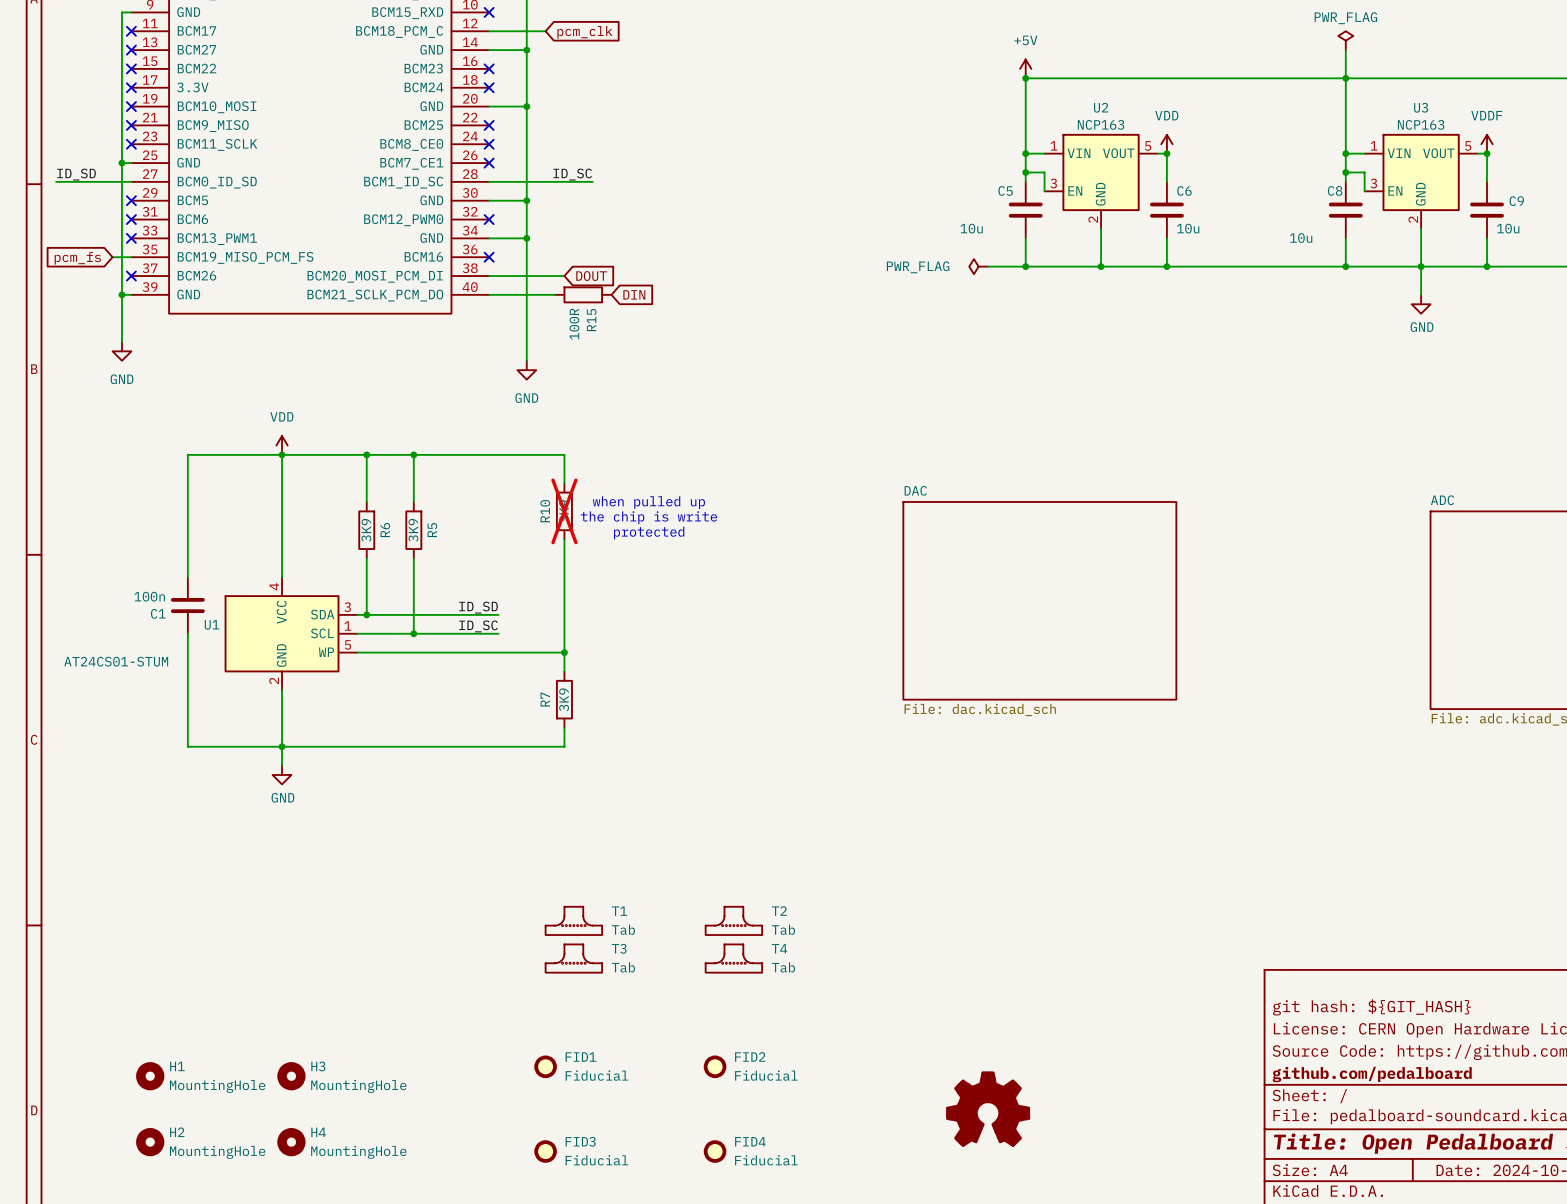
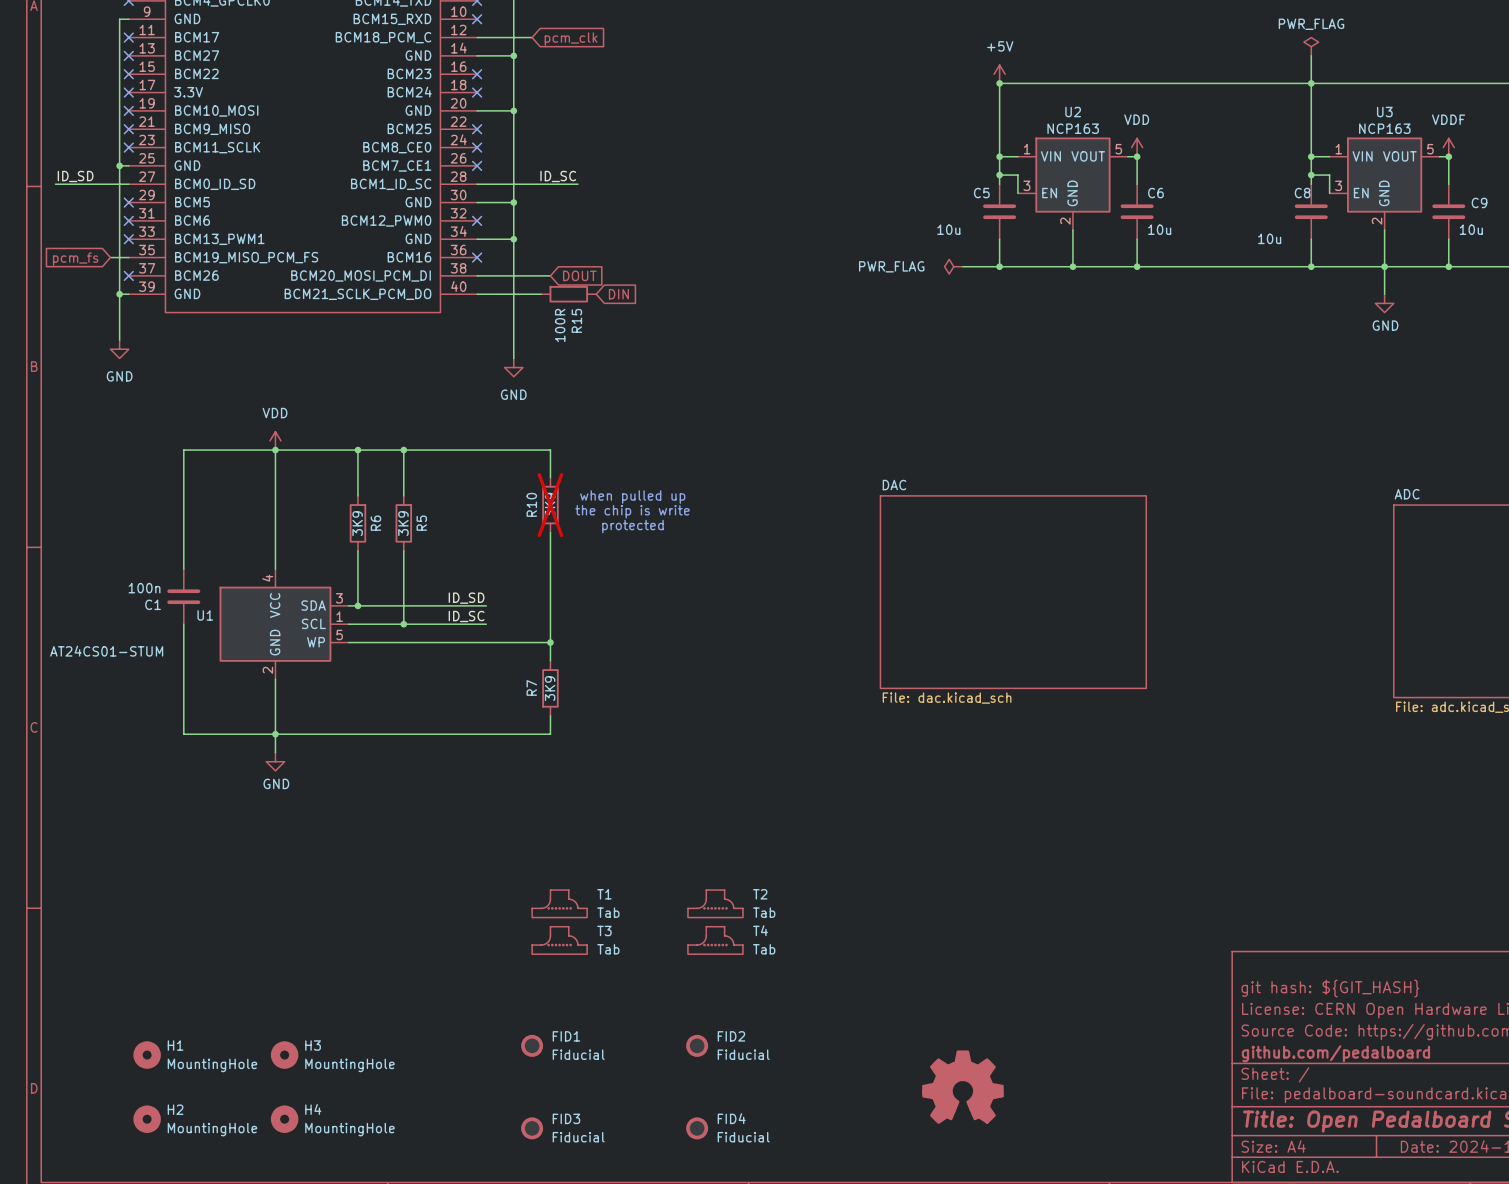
T1 symbol: [545, 906, 603, 936] -> [531, 889, 588, 919]
T2 symbol: [705, 906, 763, 936] -> [687, 889, 744, 919]
T3 symbol: [545, 943, 603, 974] -> [531, 926, 588, 955]
T4 symbol: [705, 943, 763, 974] -> [687, 926, 744, 955]

